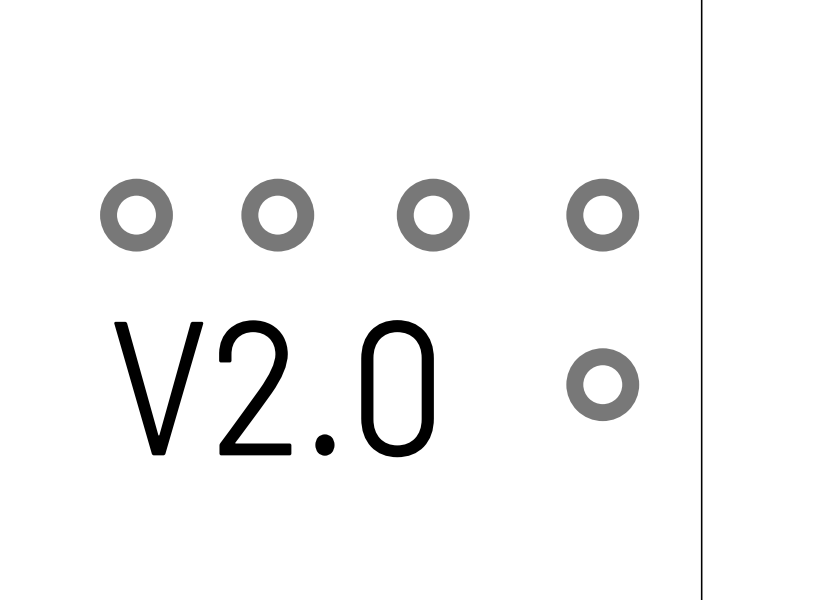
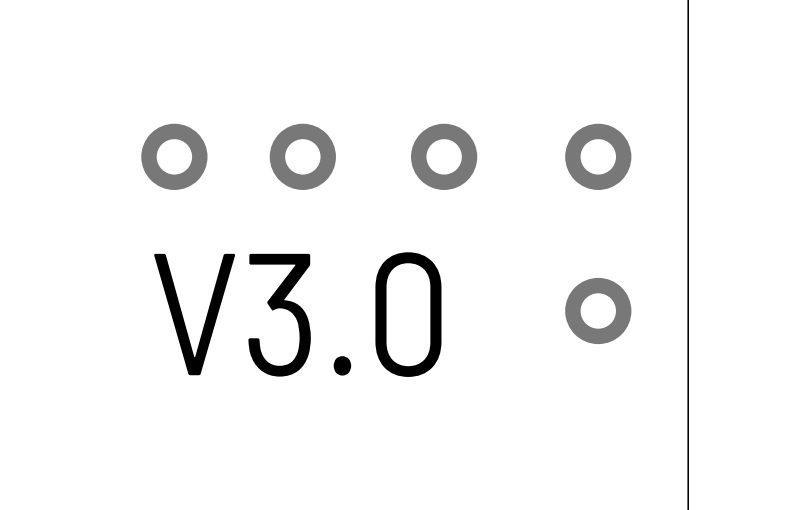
text: V2.0 (274, 388) -> V3.0 (297, 314)

